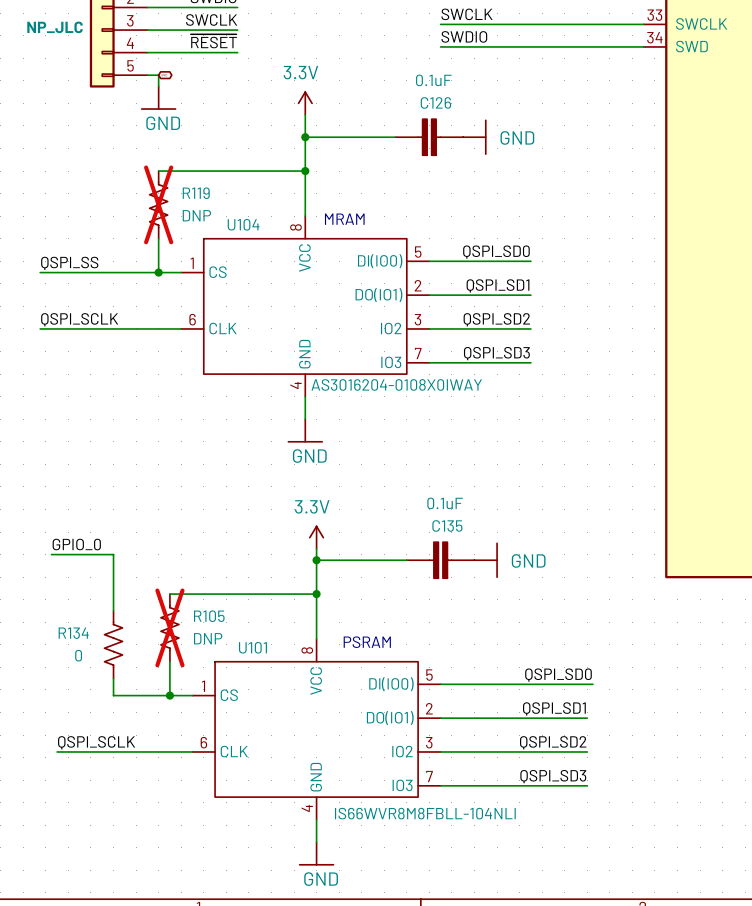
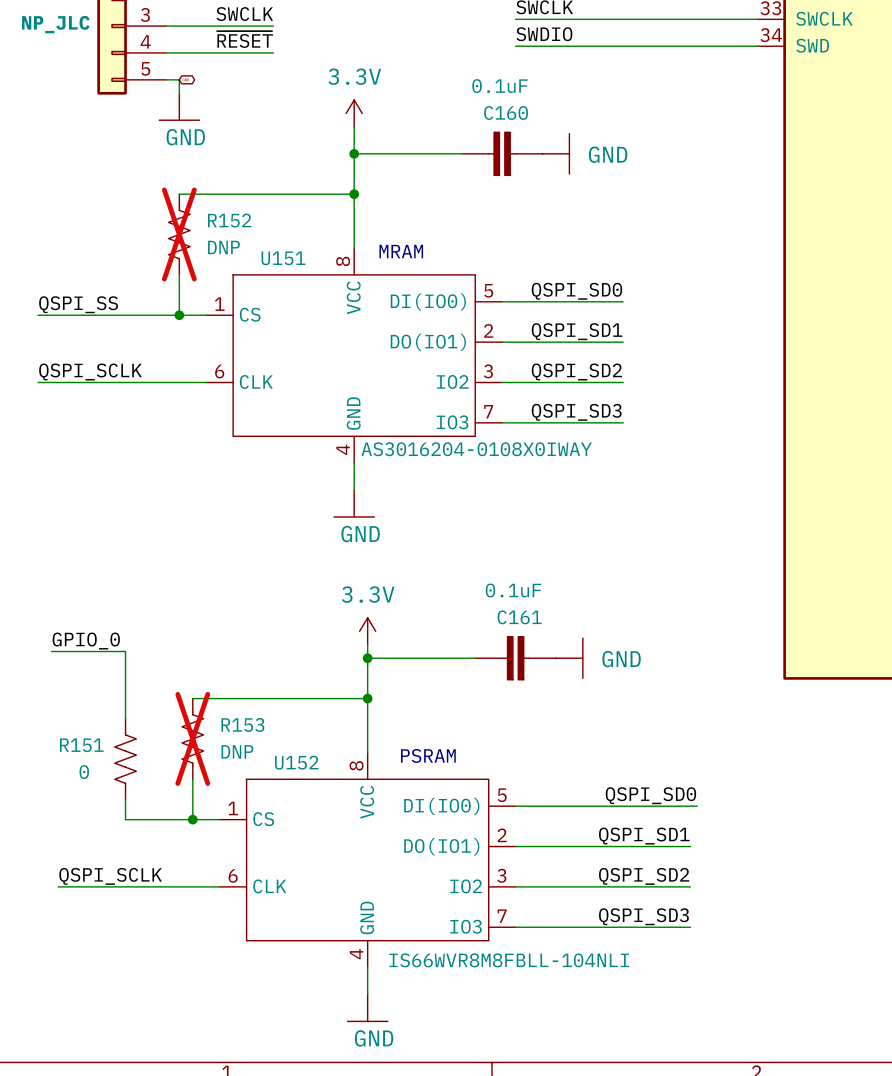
C126 name: C126 (435, 102) -> C160 (506, 112)
R119 name: R119 (196, 193) -> R152 (229, 220)
U104 name: U104 (243, 224) -> U151 (283, 258)
C135 name: C135 (447, 525) -> C161 (519, 617)
R105 name: R105 (209, 616) -> R153 (242, 724)
R134 name: R134 (73, 633) -> R151 (81, 745)
U101 name: U101 (252, 647) -> U152 (296, 762)

